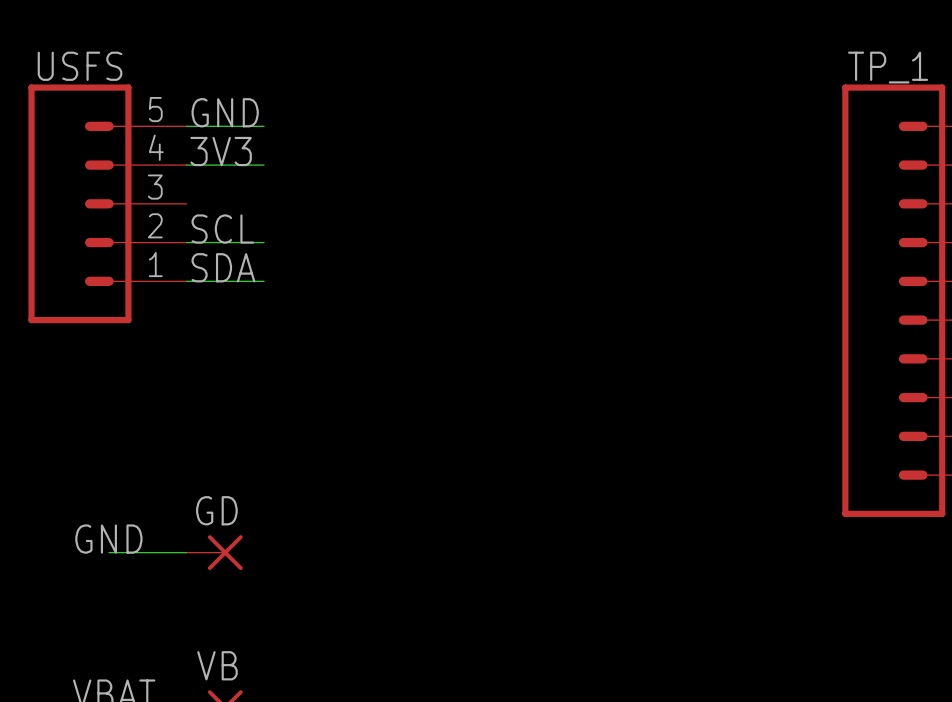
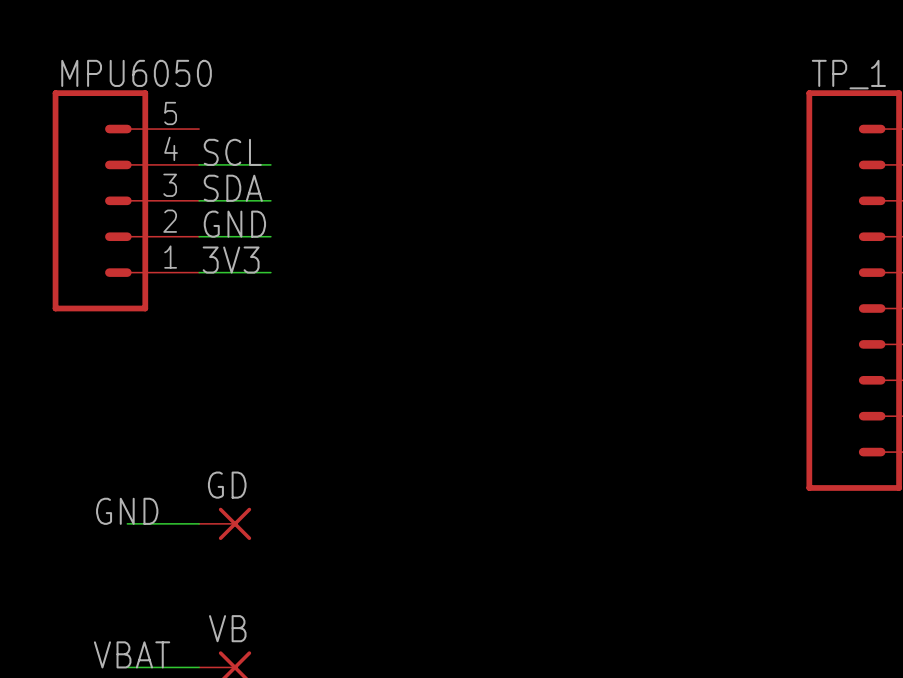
USFS name: USFS (80, 66) -> MPU6050 (136, 73)
label: GND (225, 112) -> none
wire: (186, 126) (264, 126) -> (199, 200) (270, 200)
label: 3V3 (221, 151) -> SCL (232, 152)
label: none -> SDA (233, 188)
label: SCL (222, 229) -> GND (234, 224)
label: SDA (223, 267) -> 3V3 (231, 260)

